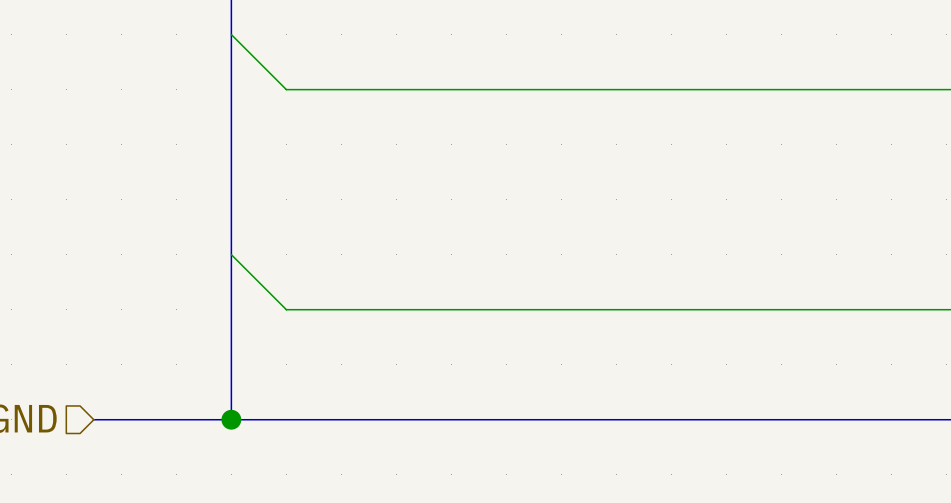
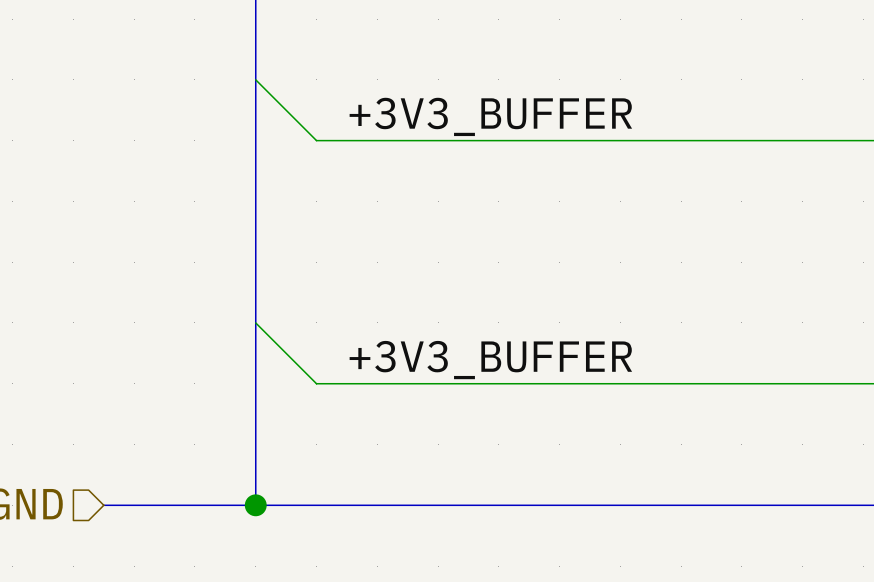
label: none -> +3V3_BUFFER (490, 116)
label: none -> +3V3_BUFFER (490, 360)

